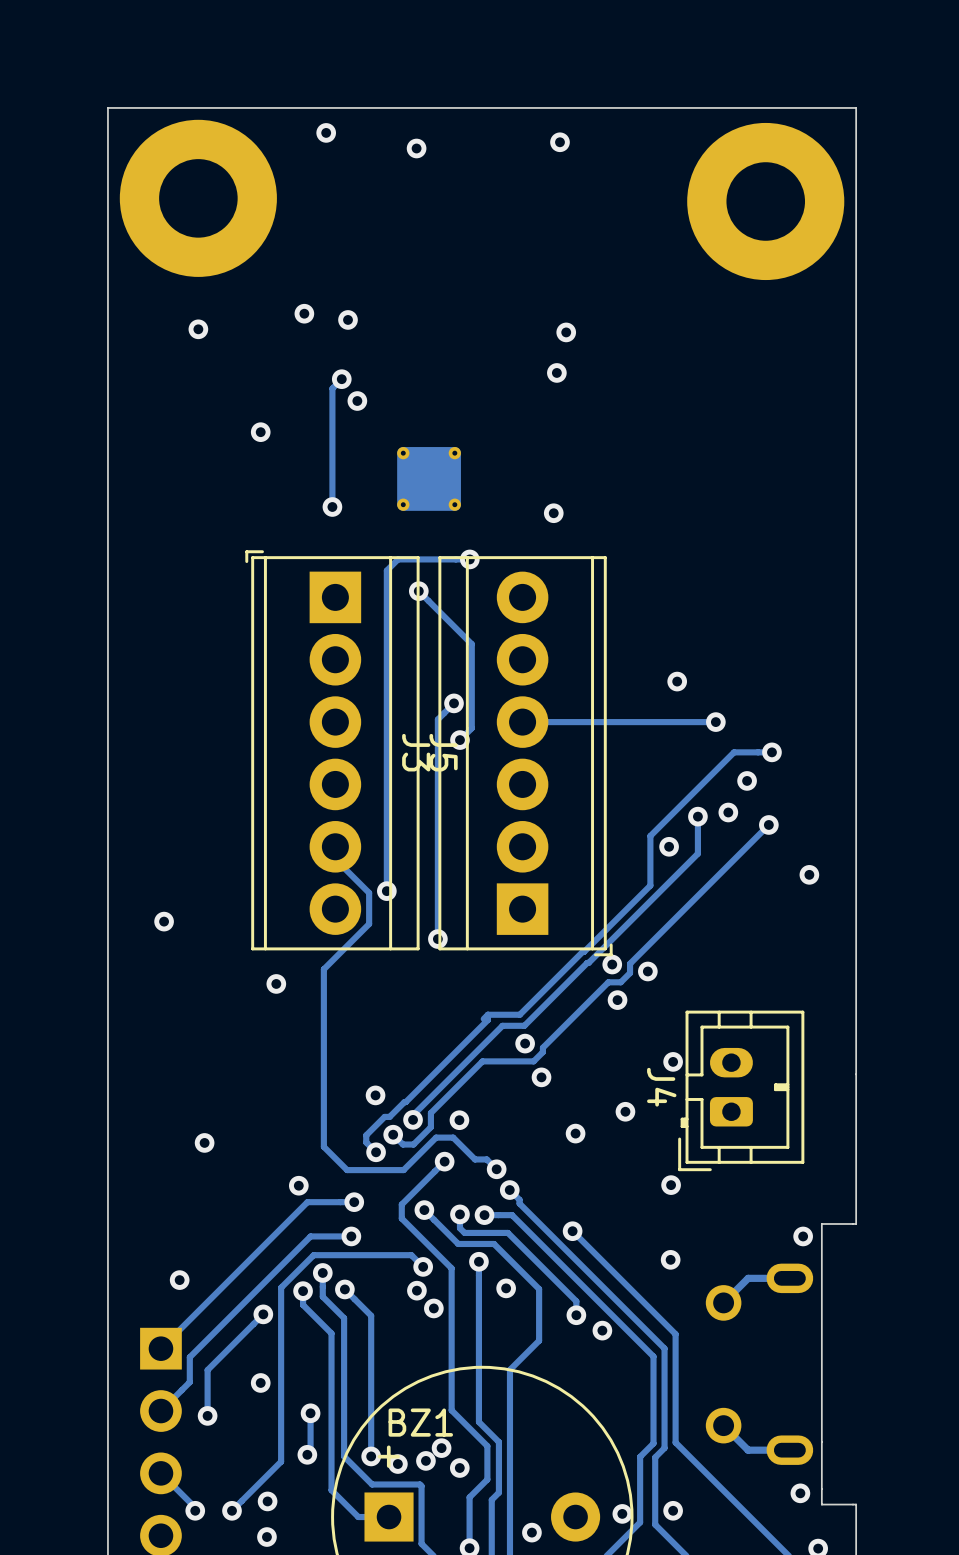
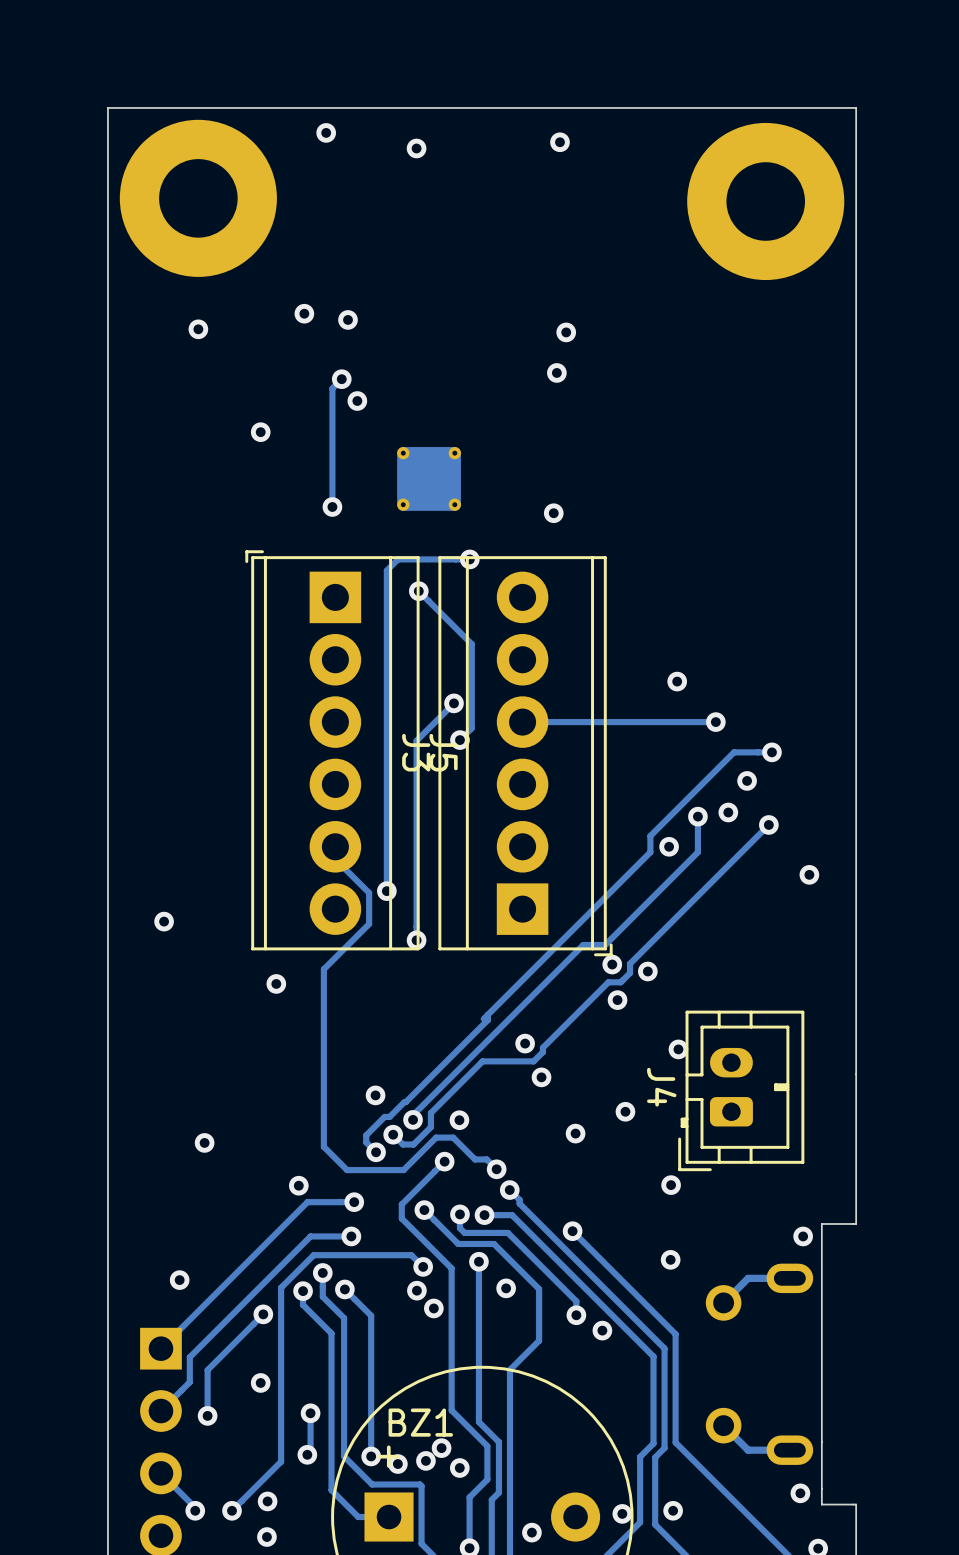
track: (437, 719) (437, 939) -> (437, 719) (416, 740) (416, 940)
track: (650, 852) (650, 885) (584, 951) (519, 1014) (487, 1014) -> (650, 852) (487, 1014)
track: (697, 852) (524, 1025) (502, 1025) -> (697, 852) (605, 945) (583, 945) (502, 1025)
via position: (437, 939) -> (416, 940)
via position: (673, 1061) -> (678, 1049)

